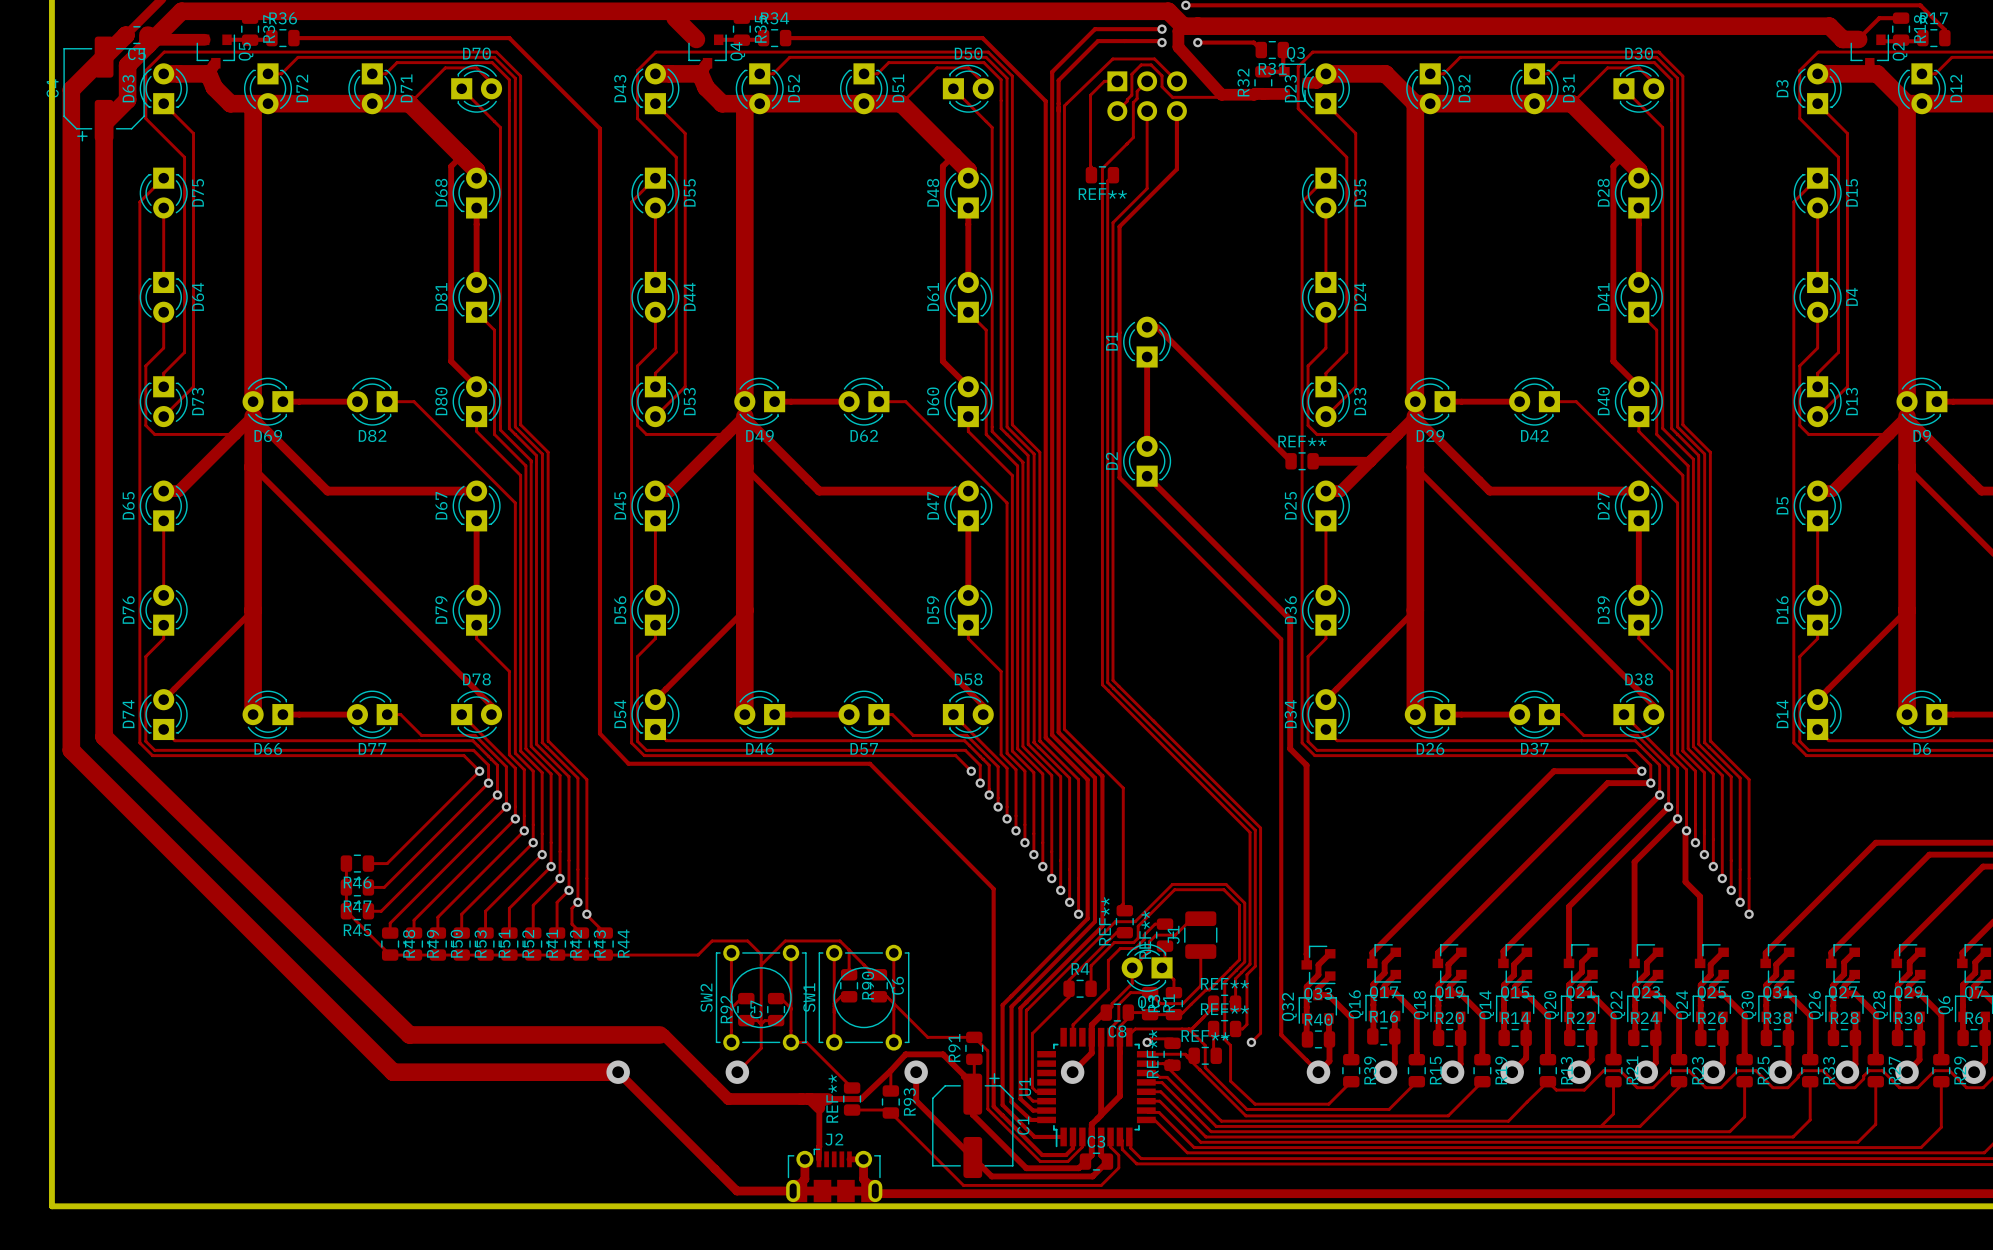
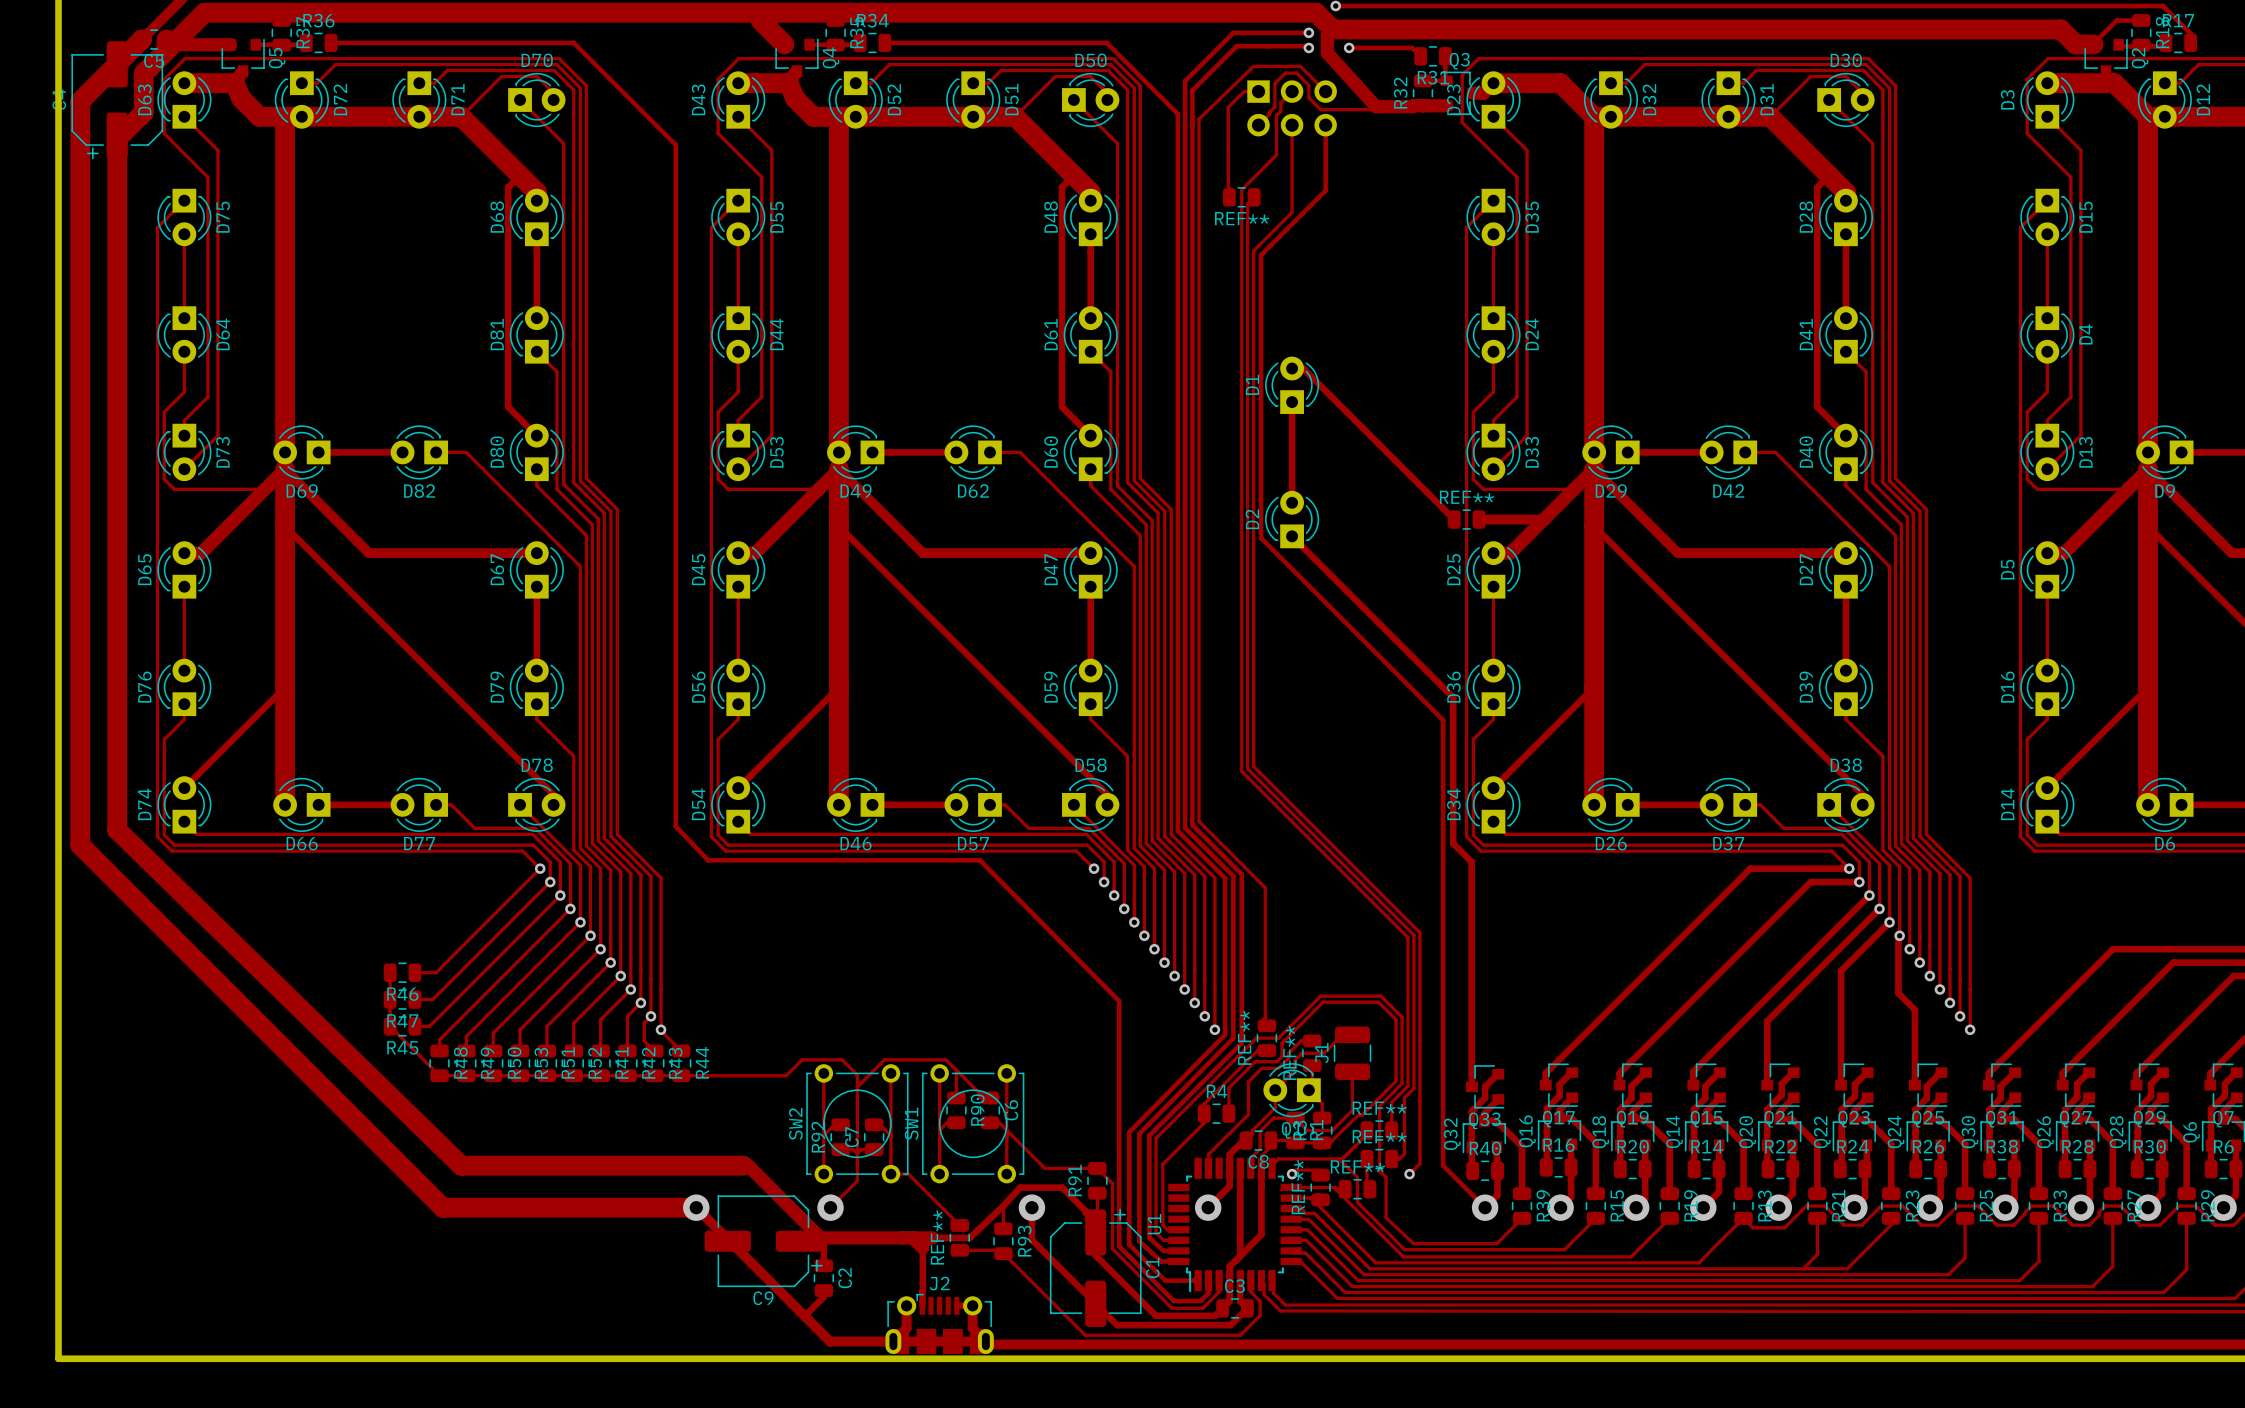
track: none -> (822, 1239) (823, 1241) (823, 1265)
C9: none -> (763, 1241)
C2: none -> (823, 1278)
track: none -> (823, 1290) (823, 1297) (805, 1316)

